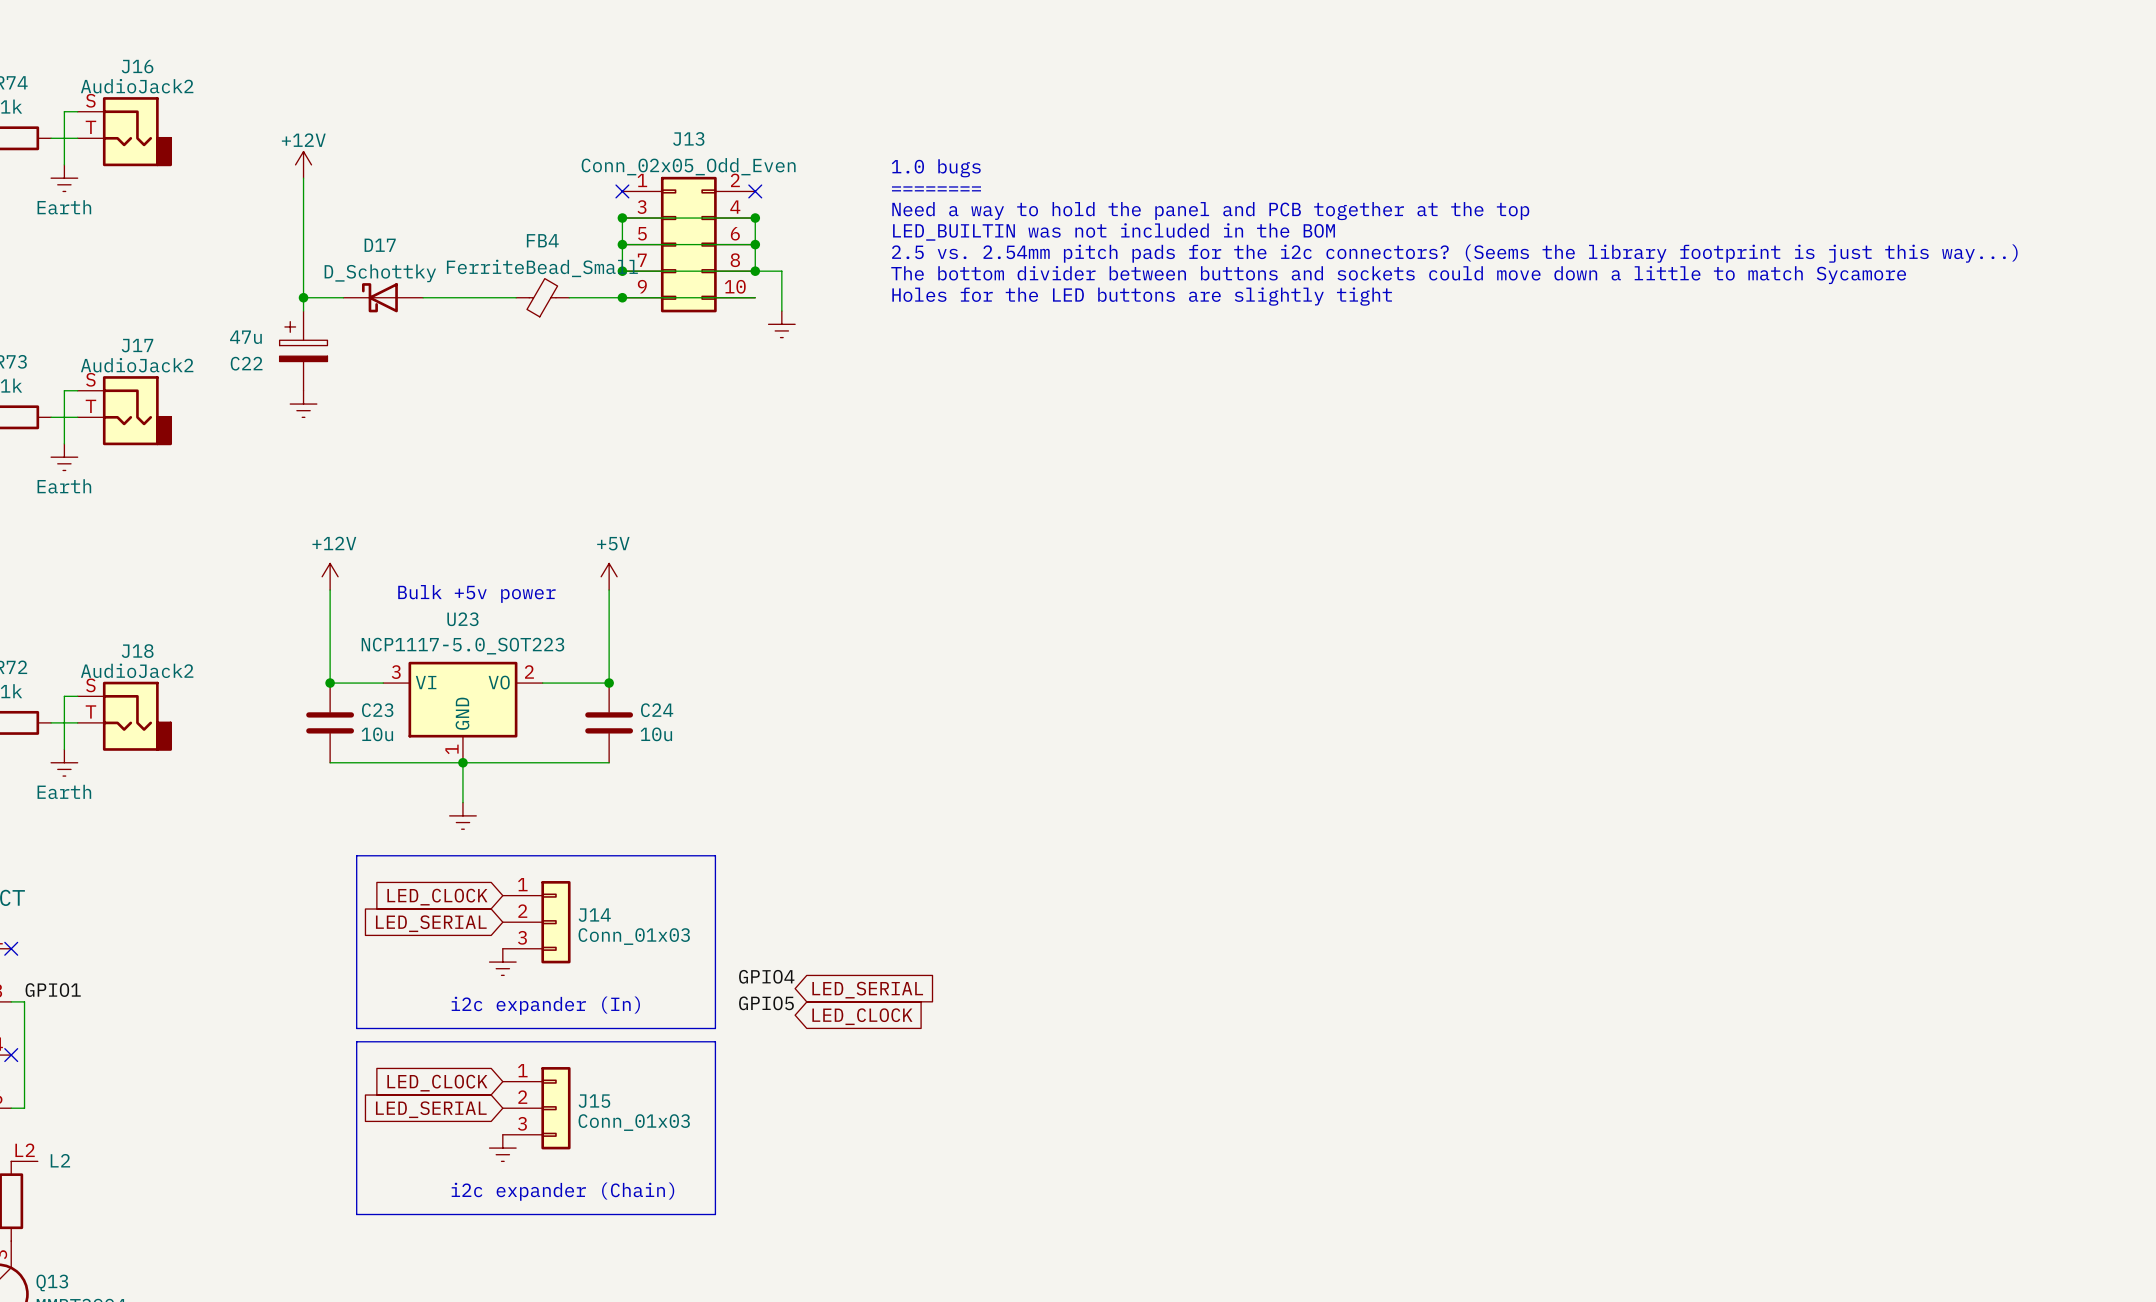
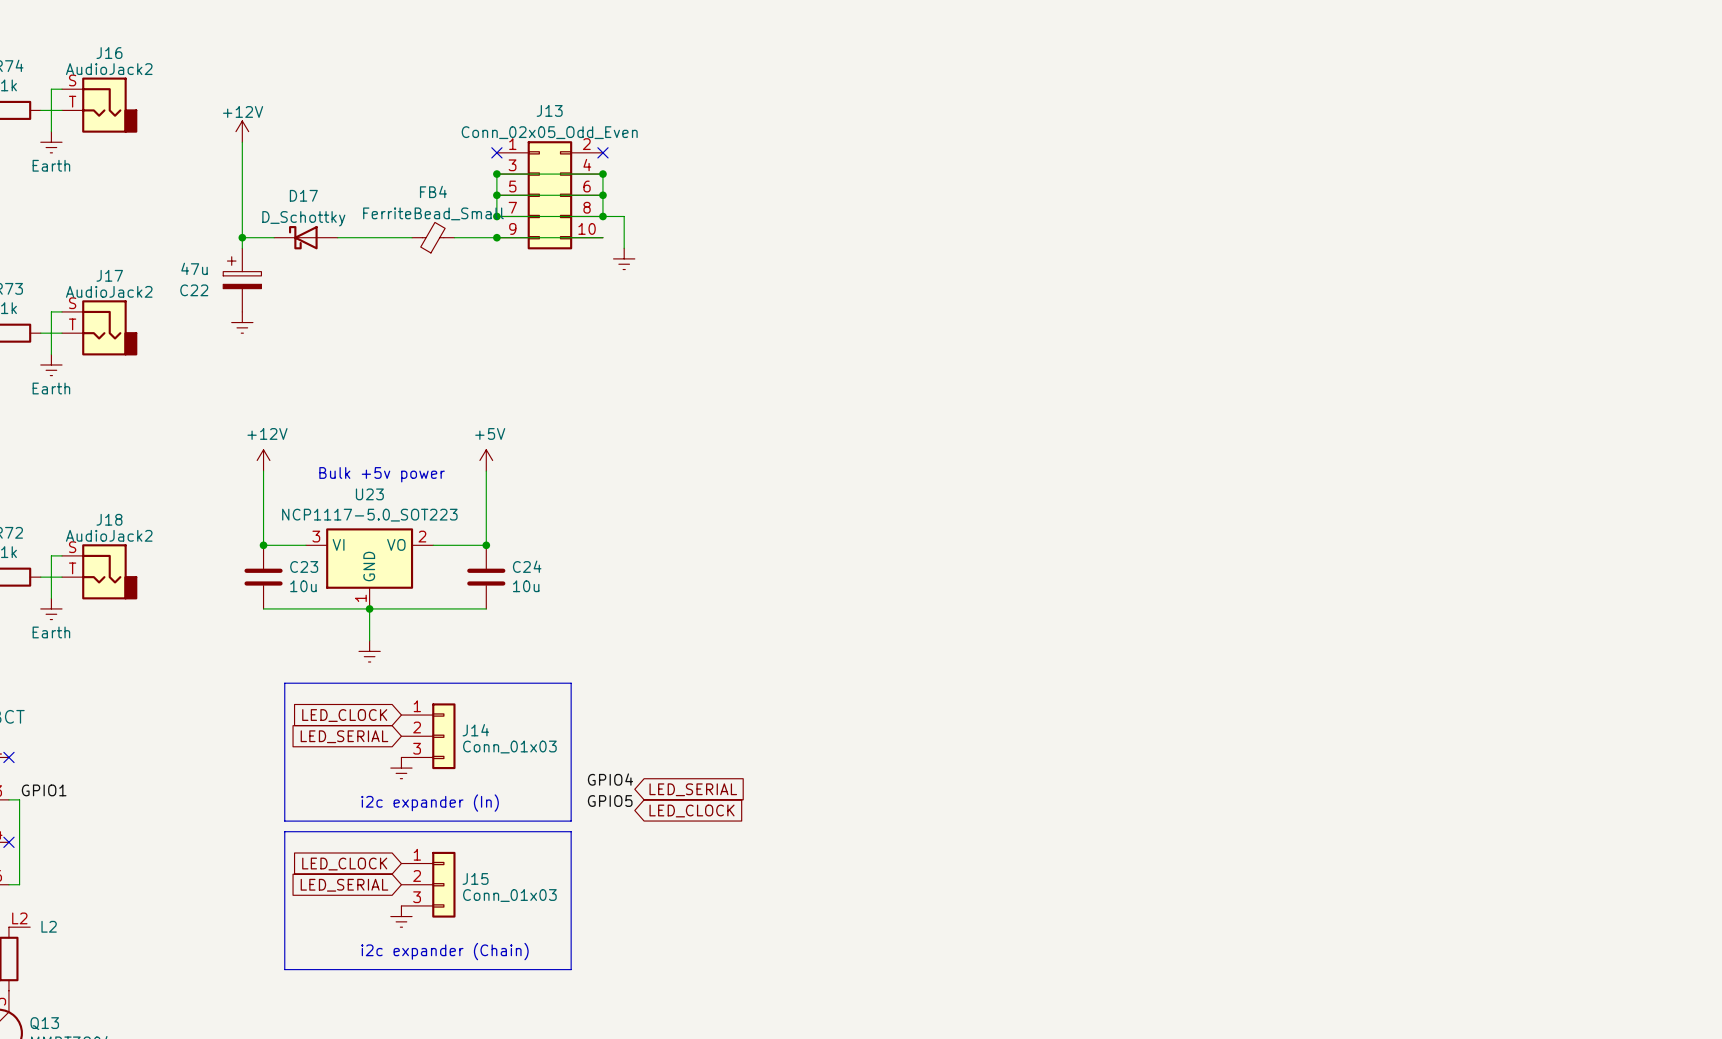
text: 1.0 bugs (936, 168) -> none
text: ======== (936, 188) -> none
text: Need a way to hold the panel and PCB together at the top (1210, 211) -> none
text: LED_BUILTIN was not included in the BOM (1114, 231) -> none
text: 2.5 vs. 2.54mm pitch pads for the i2c connectors? (Seems the library footprint is just this way...) (1454, 253) -> none
text: The bottom divider between buttons and sockets could move down a little to match Sycamore (1398, 275) -> none
text: Holes for the LED buttons are slightly tight (1142, 296) -> none

